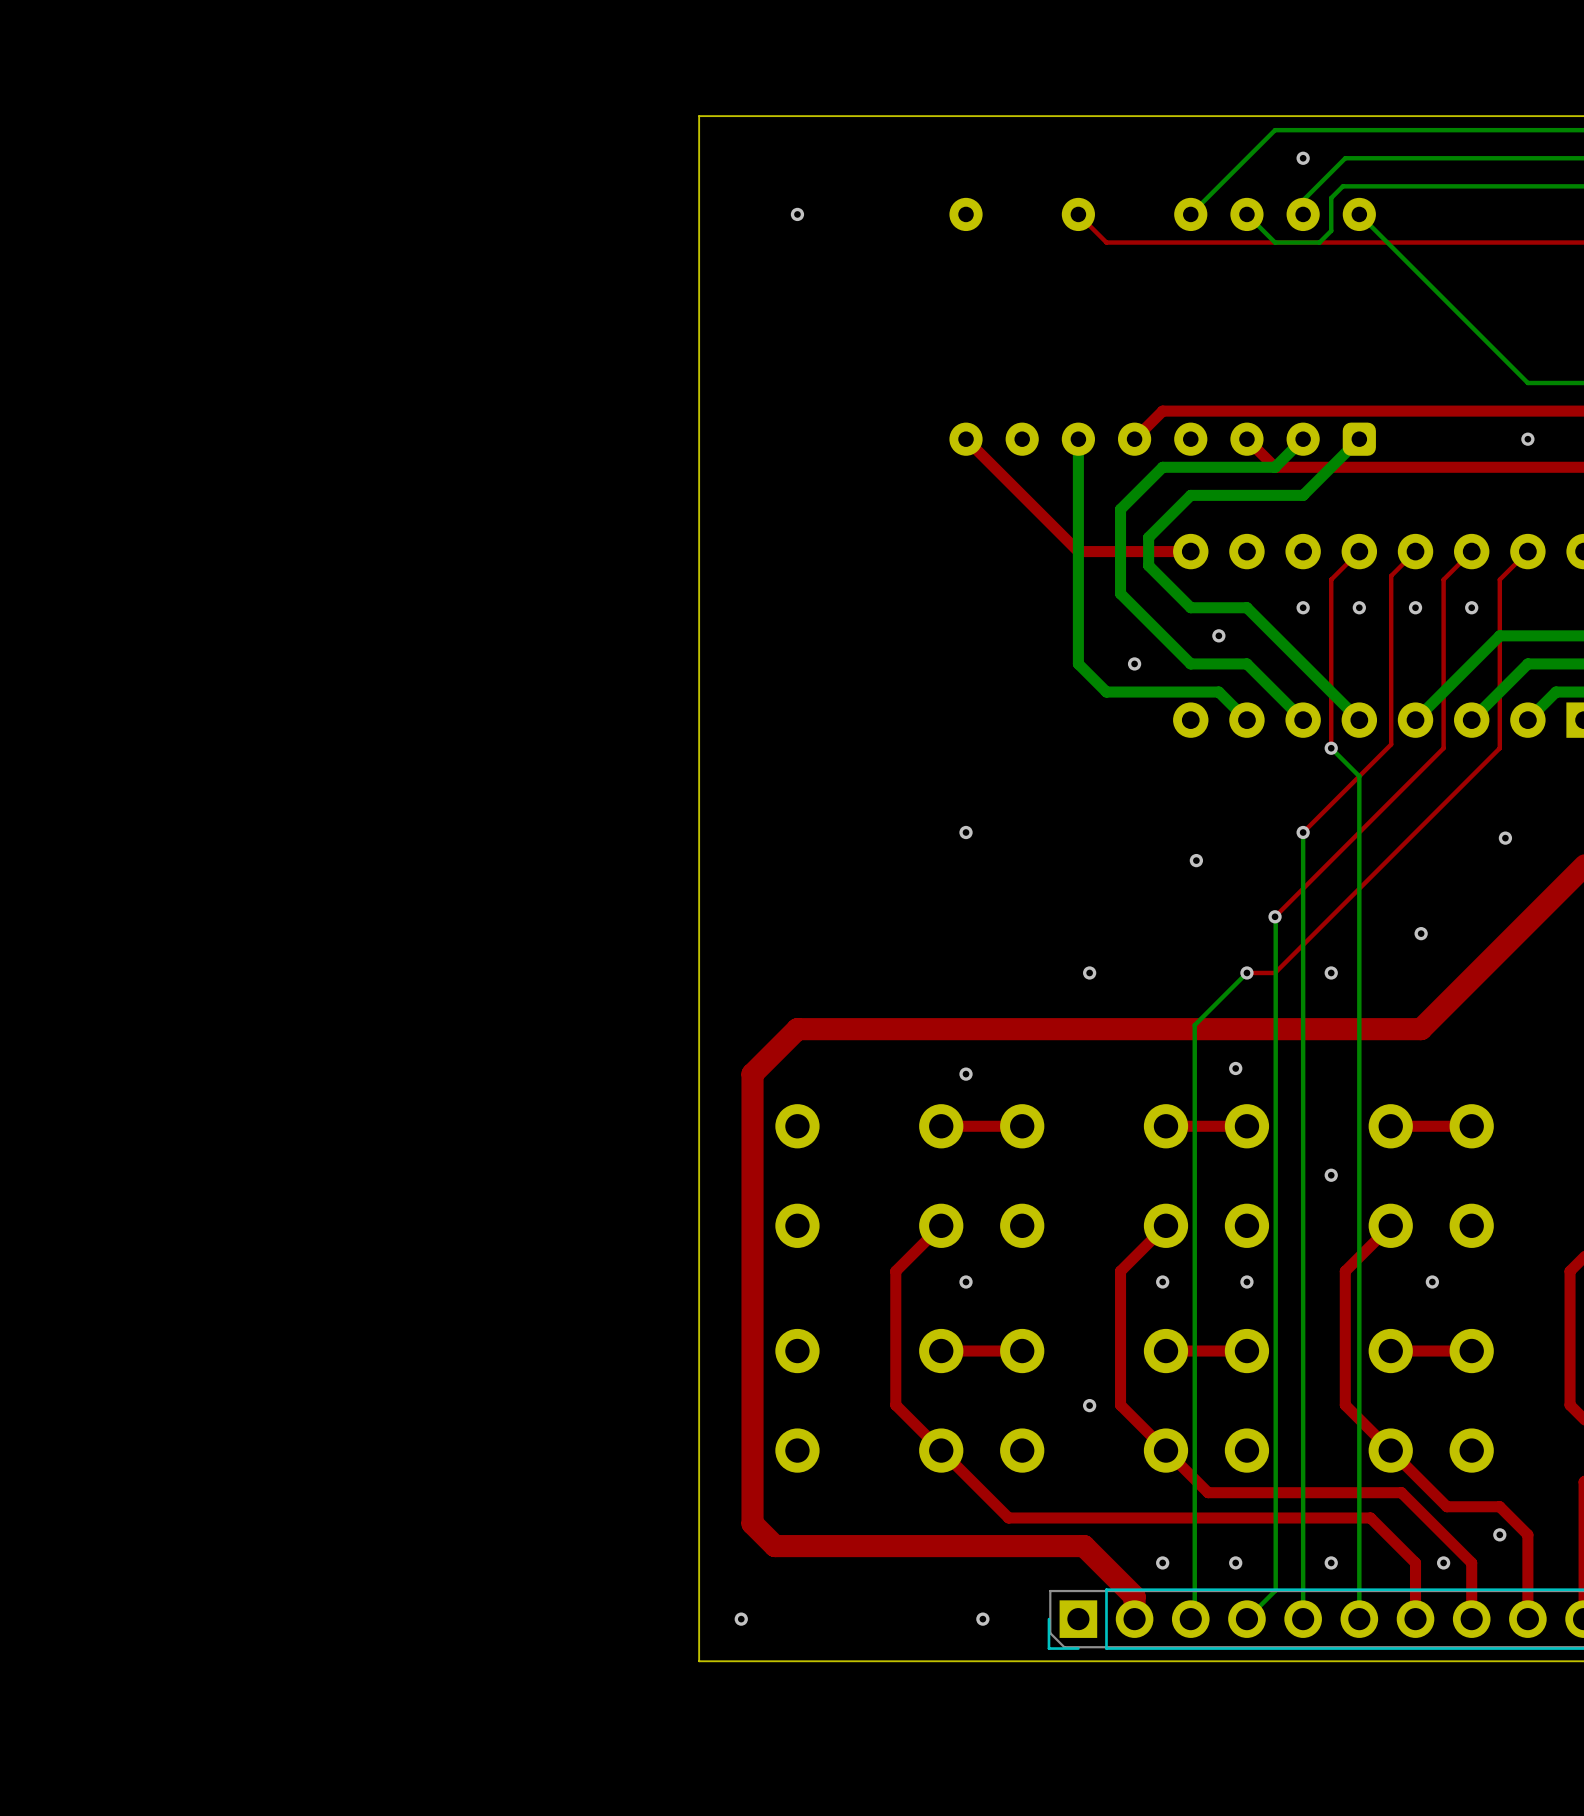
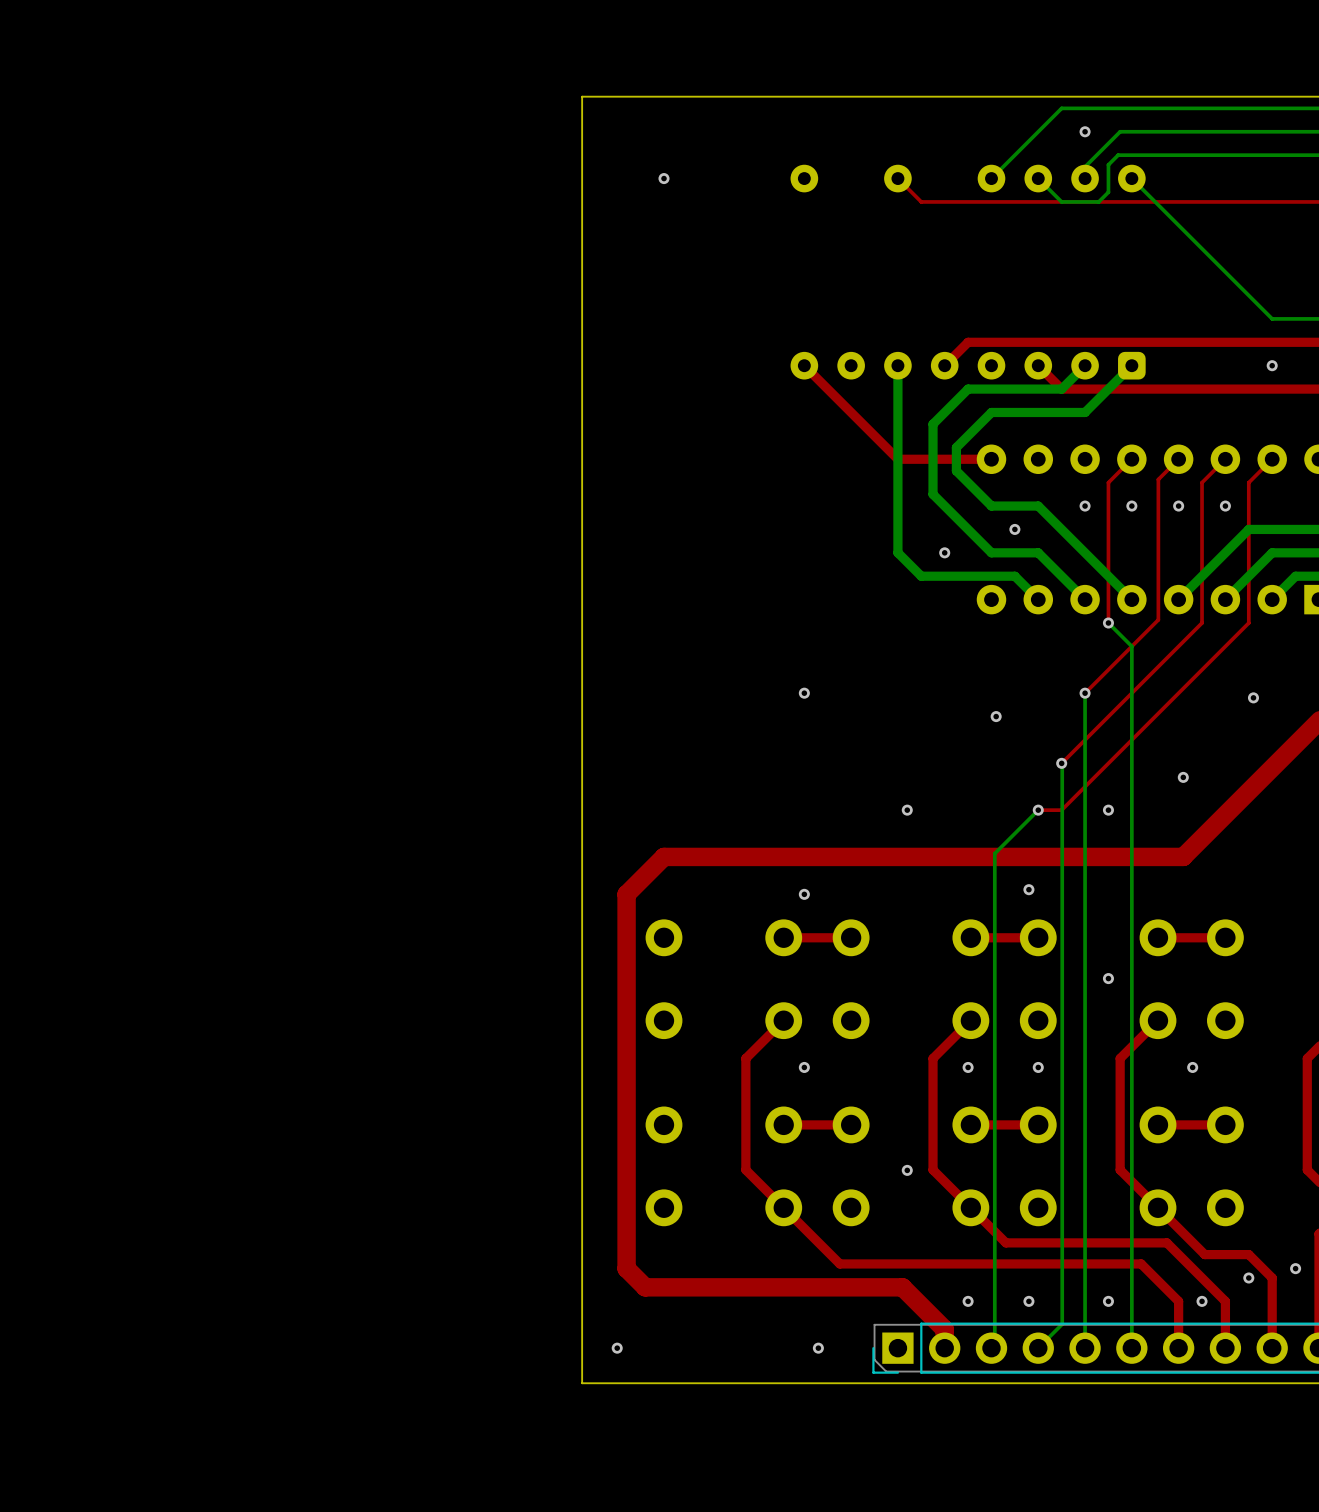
via: none -> (1295, 1268)

